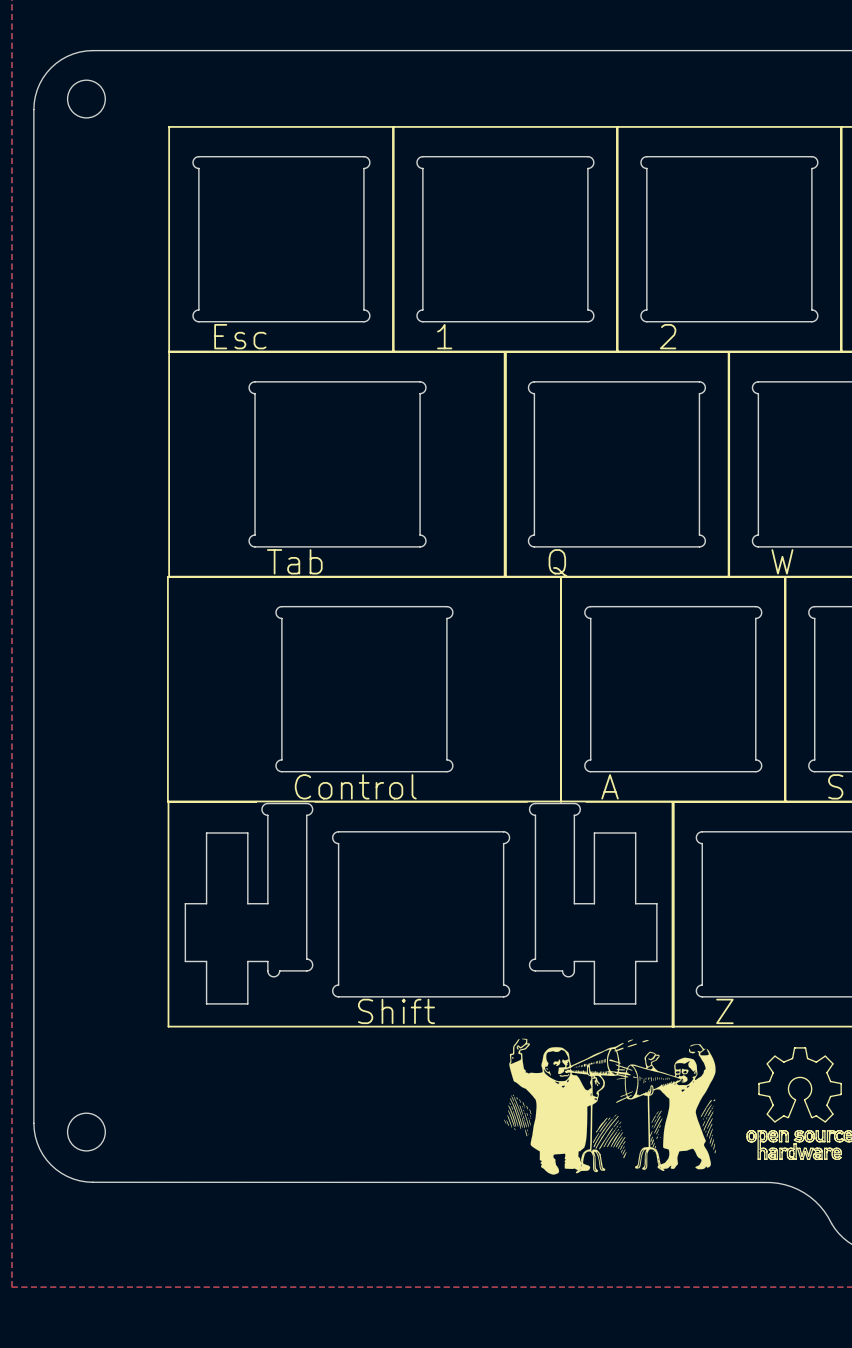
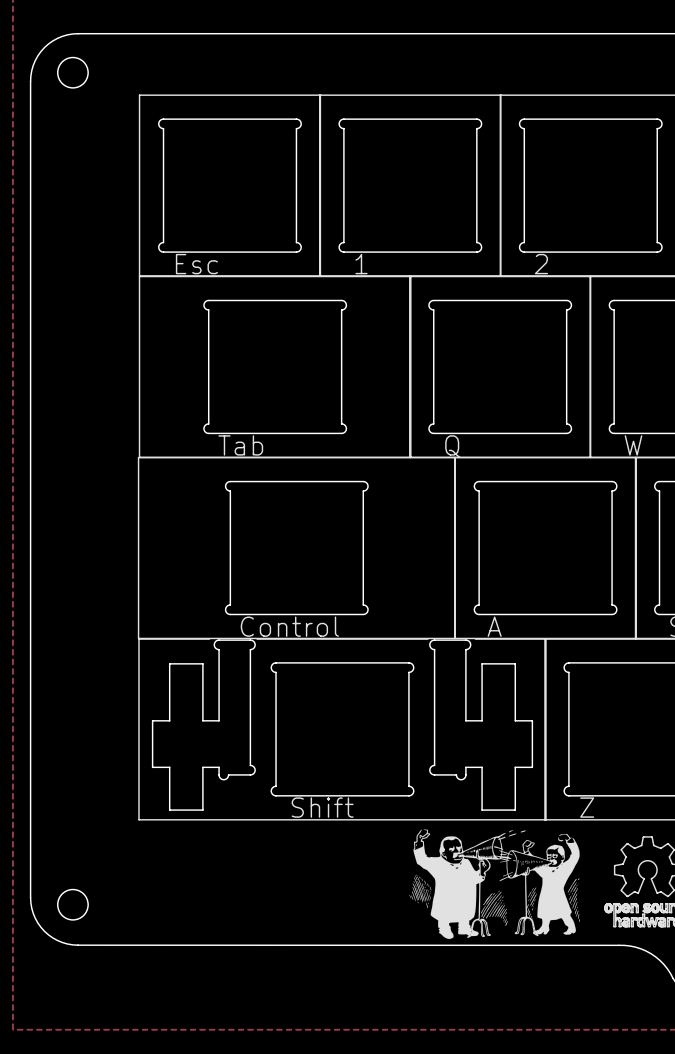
drawing shape: [167, 801, 675, 1028] -> [138, 638, 547, 821]

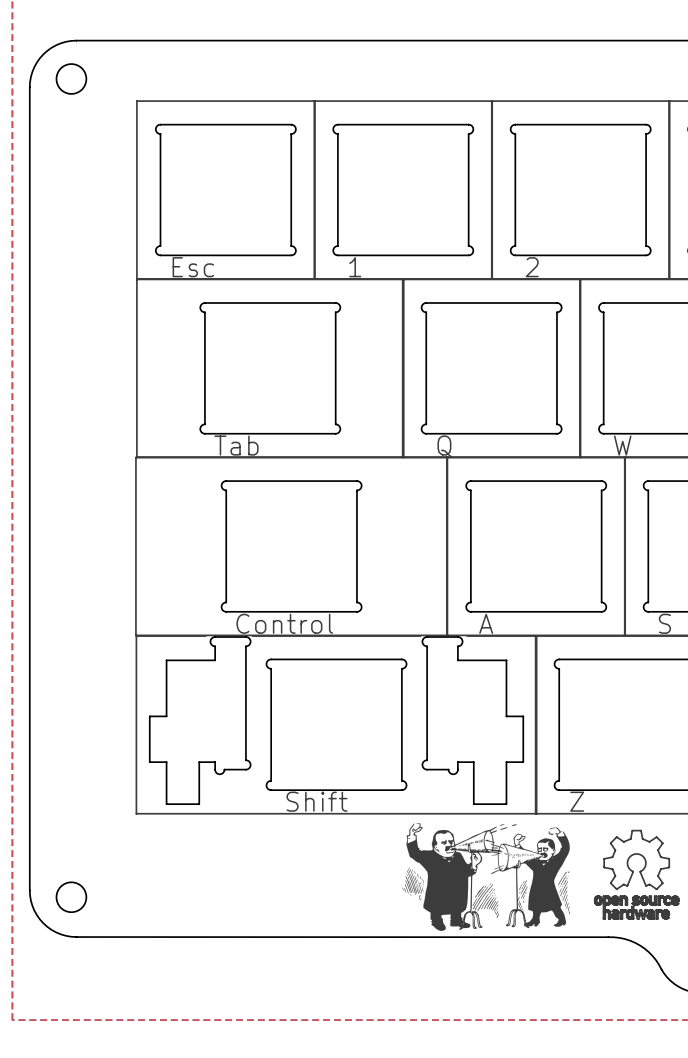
drawing shape: [138, 638, 547, 821] -> [135, 635, 538, 815]

